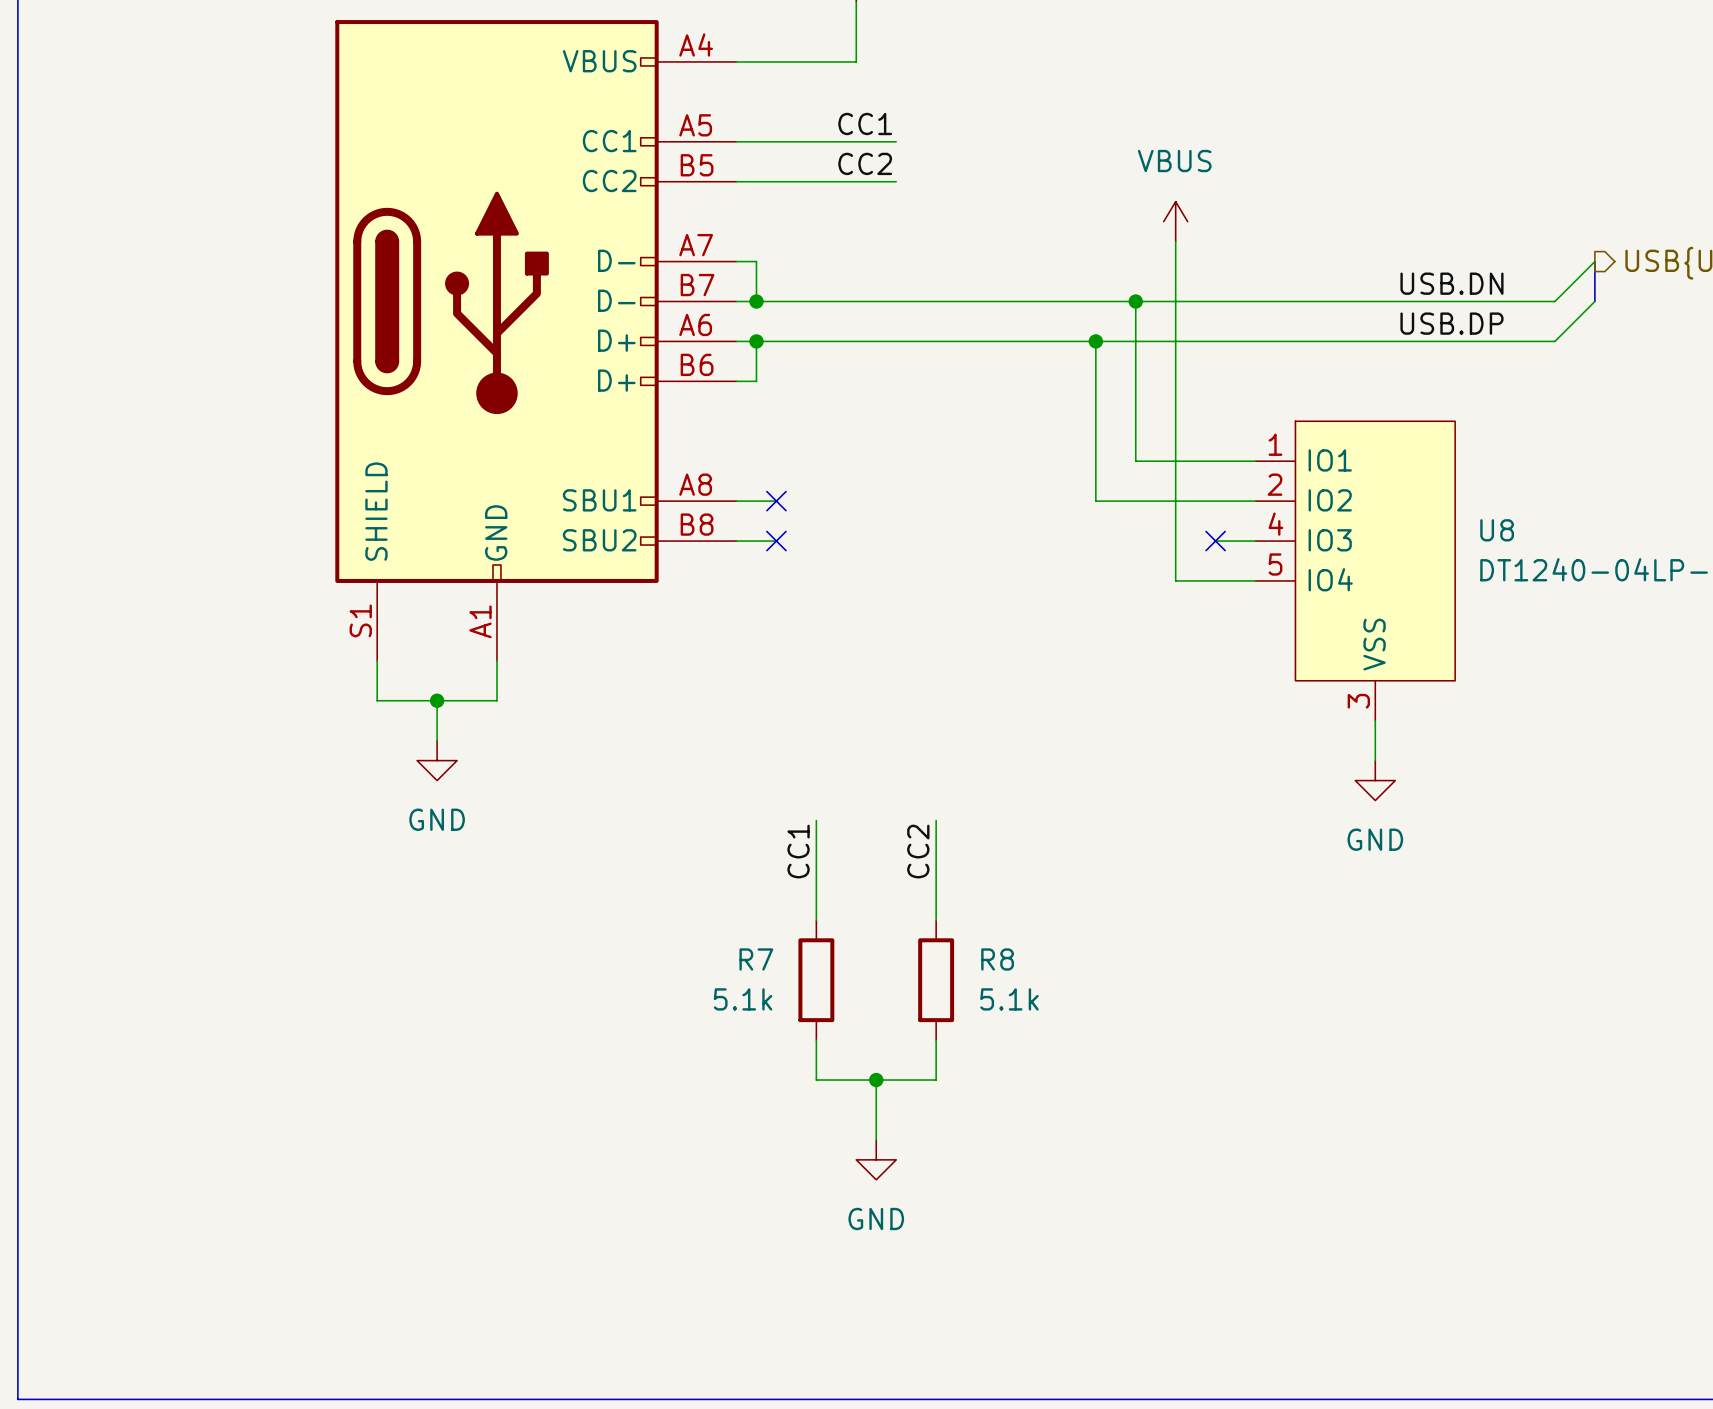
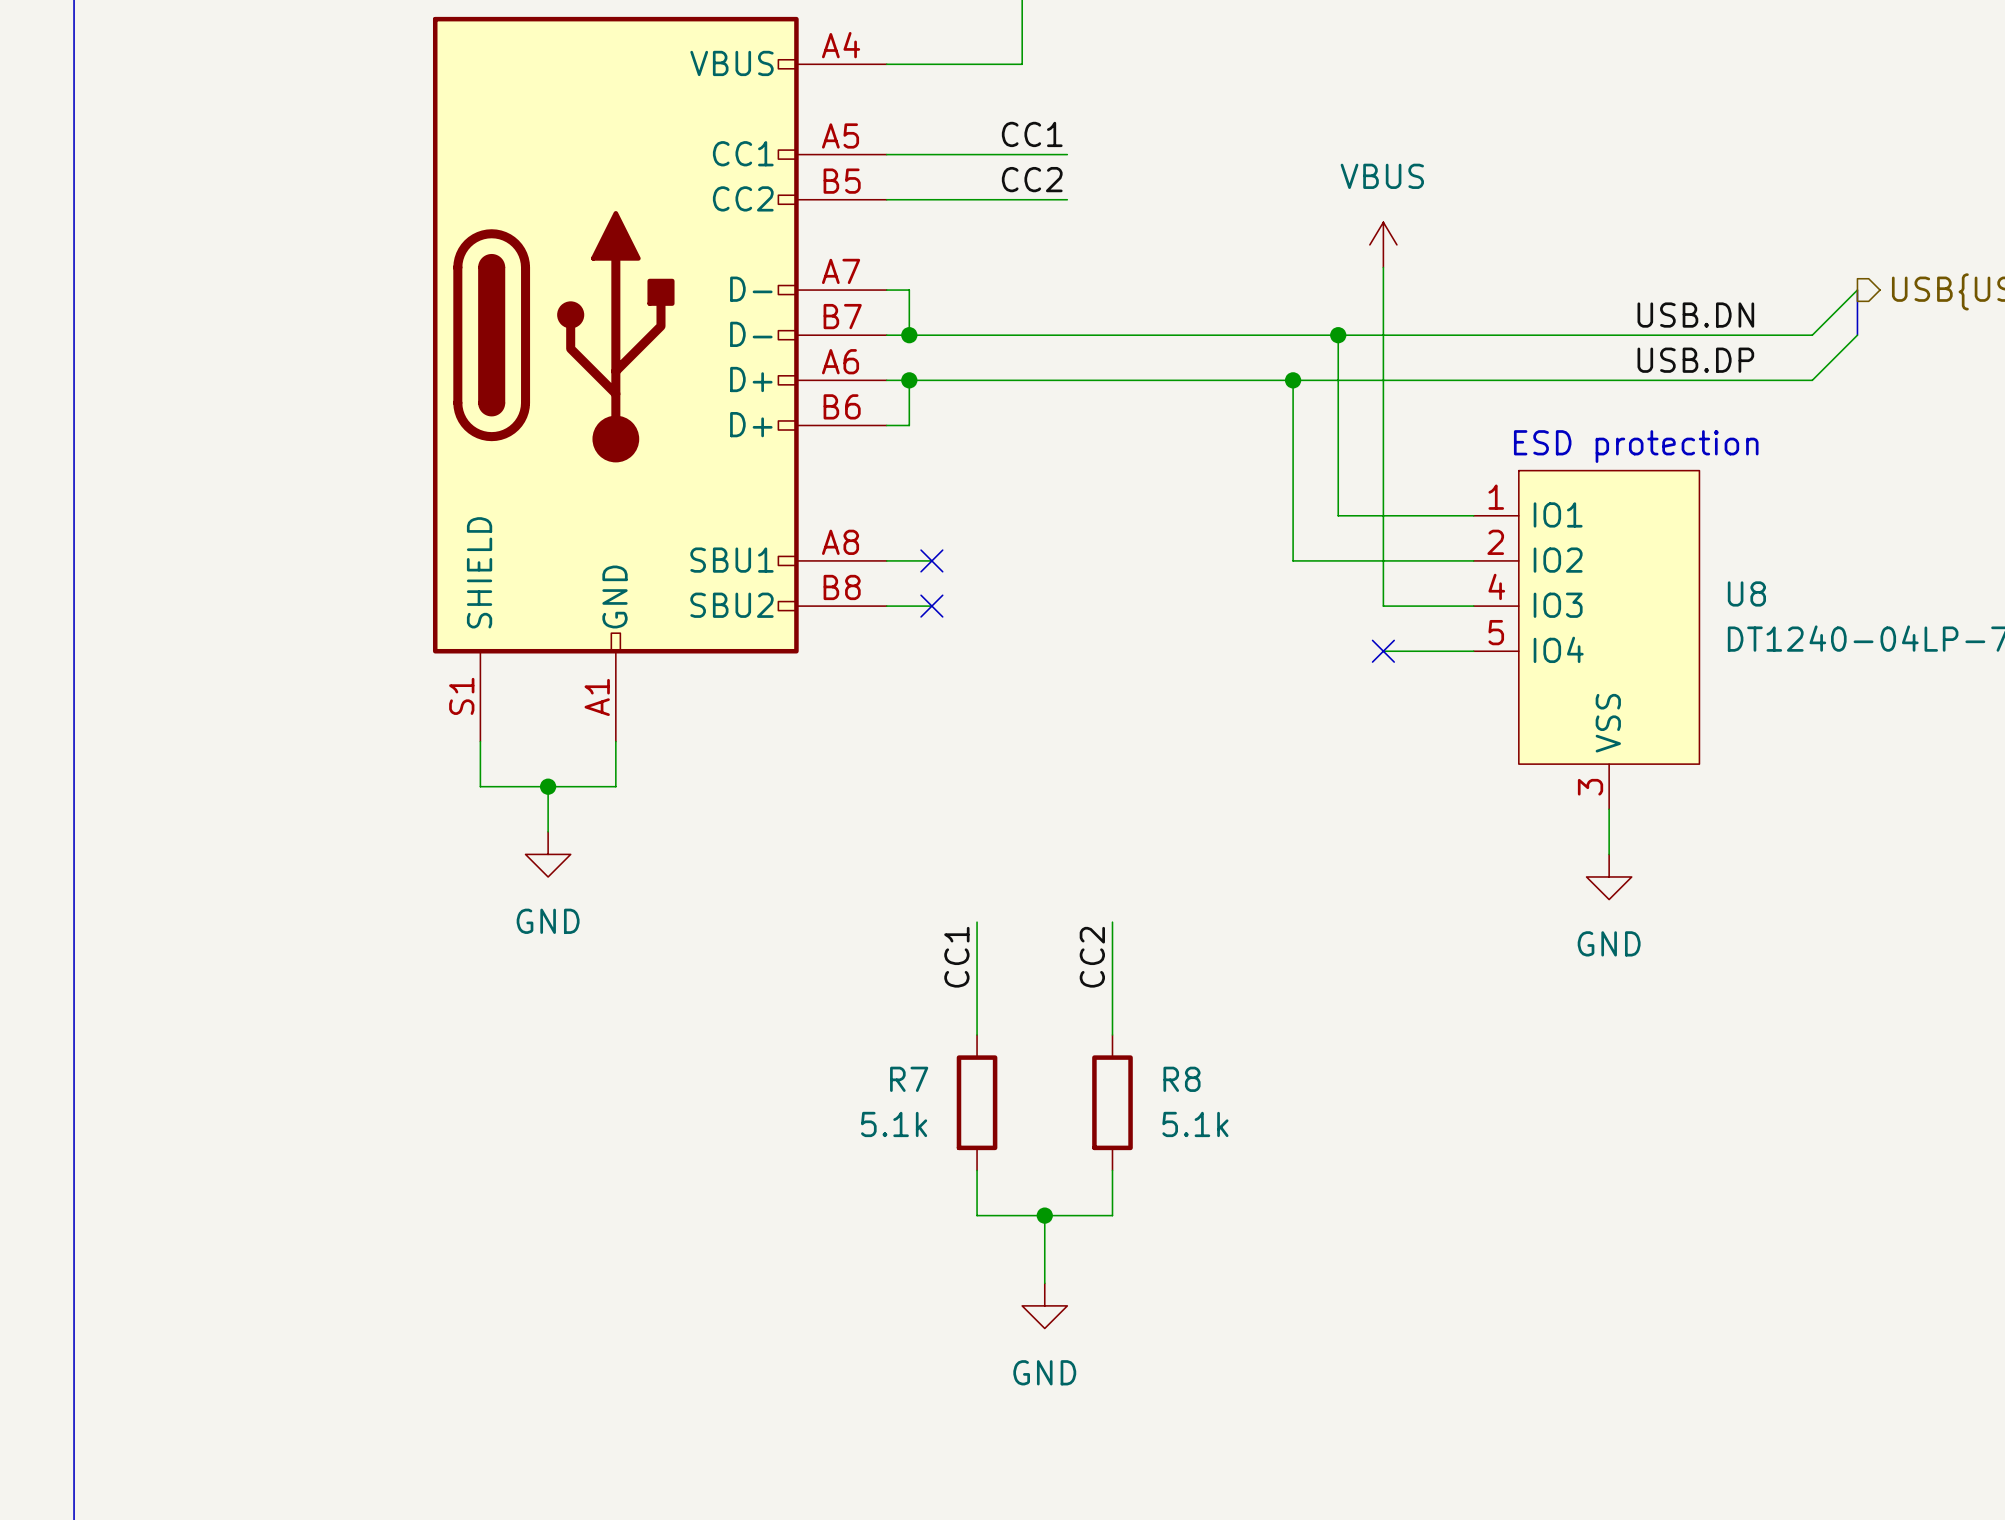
text: none -> ESD protection (1636, 446)
wire: (1175, 541) (1175, 580) -> (1383, 606) (1428, 606)
no-connect mark position: (1215, 541) -> (1383, 651)

